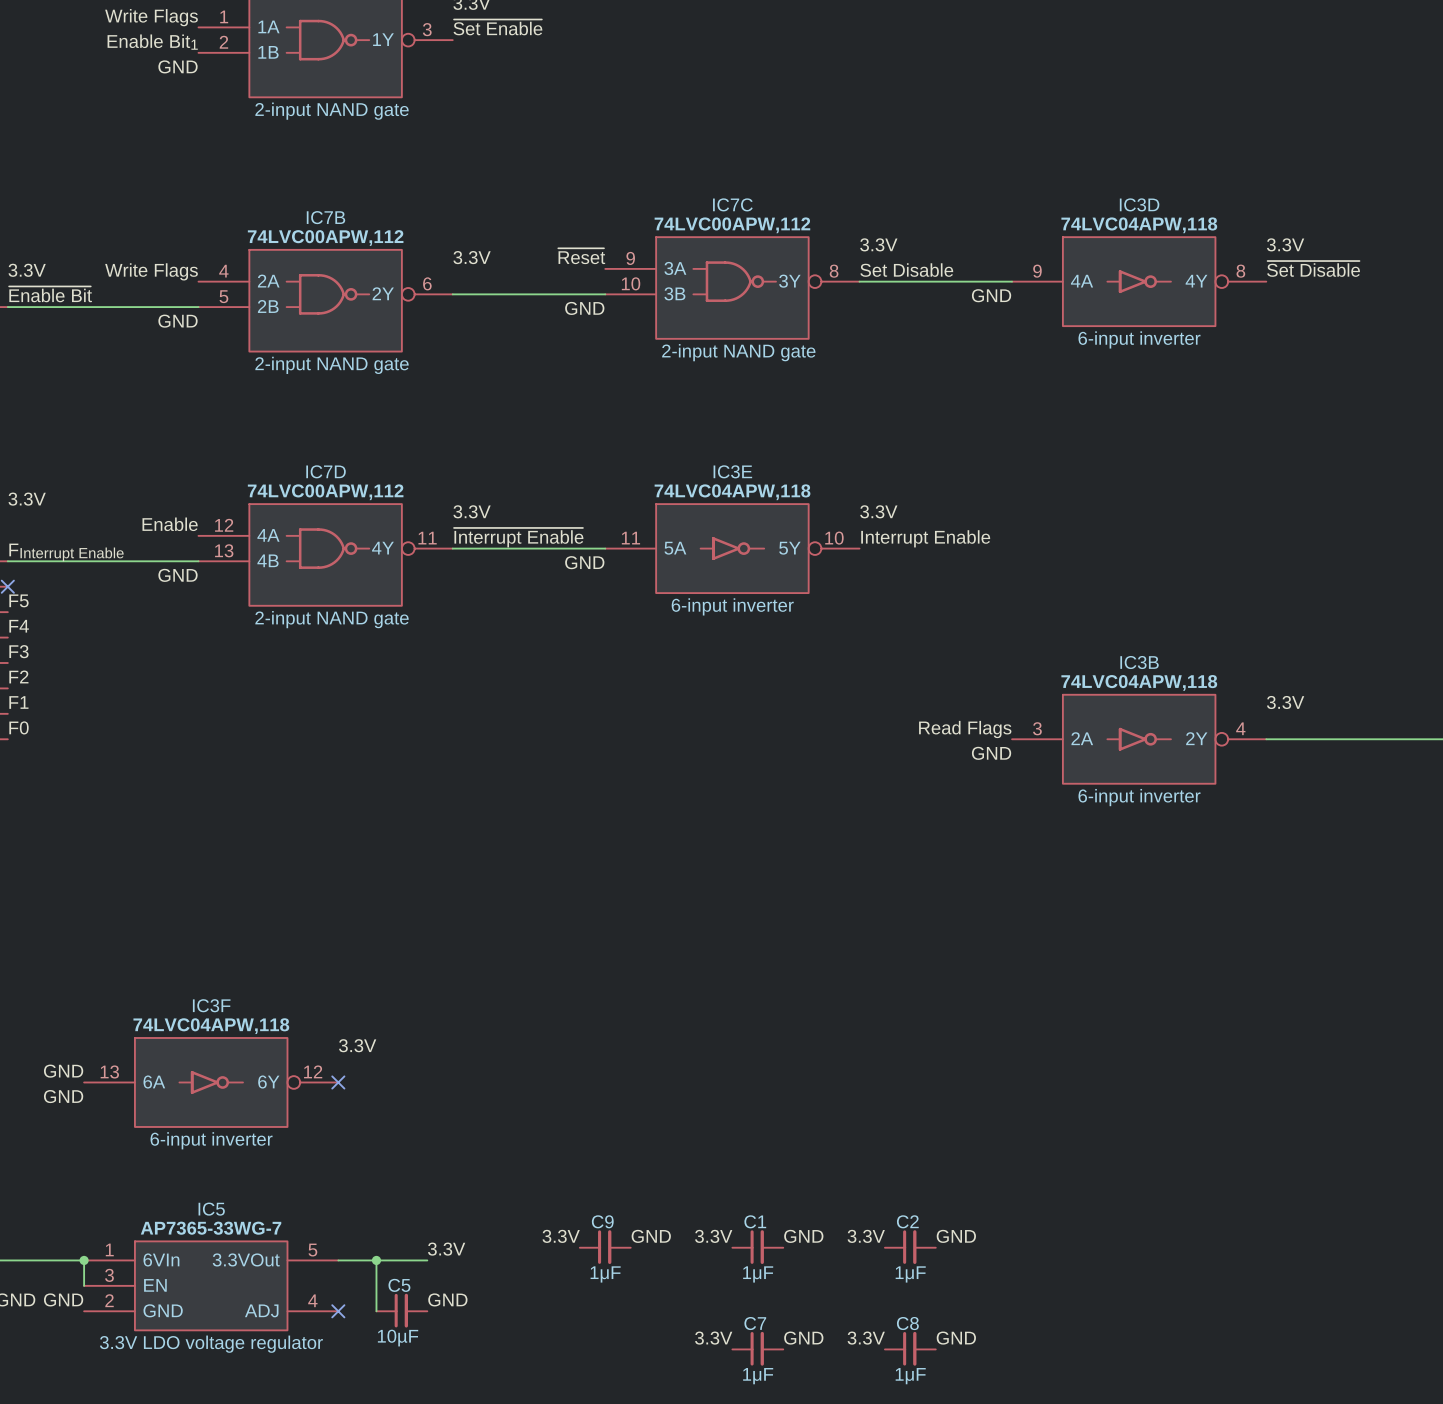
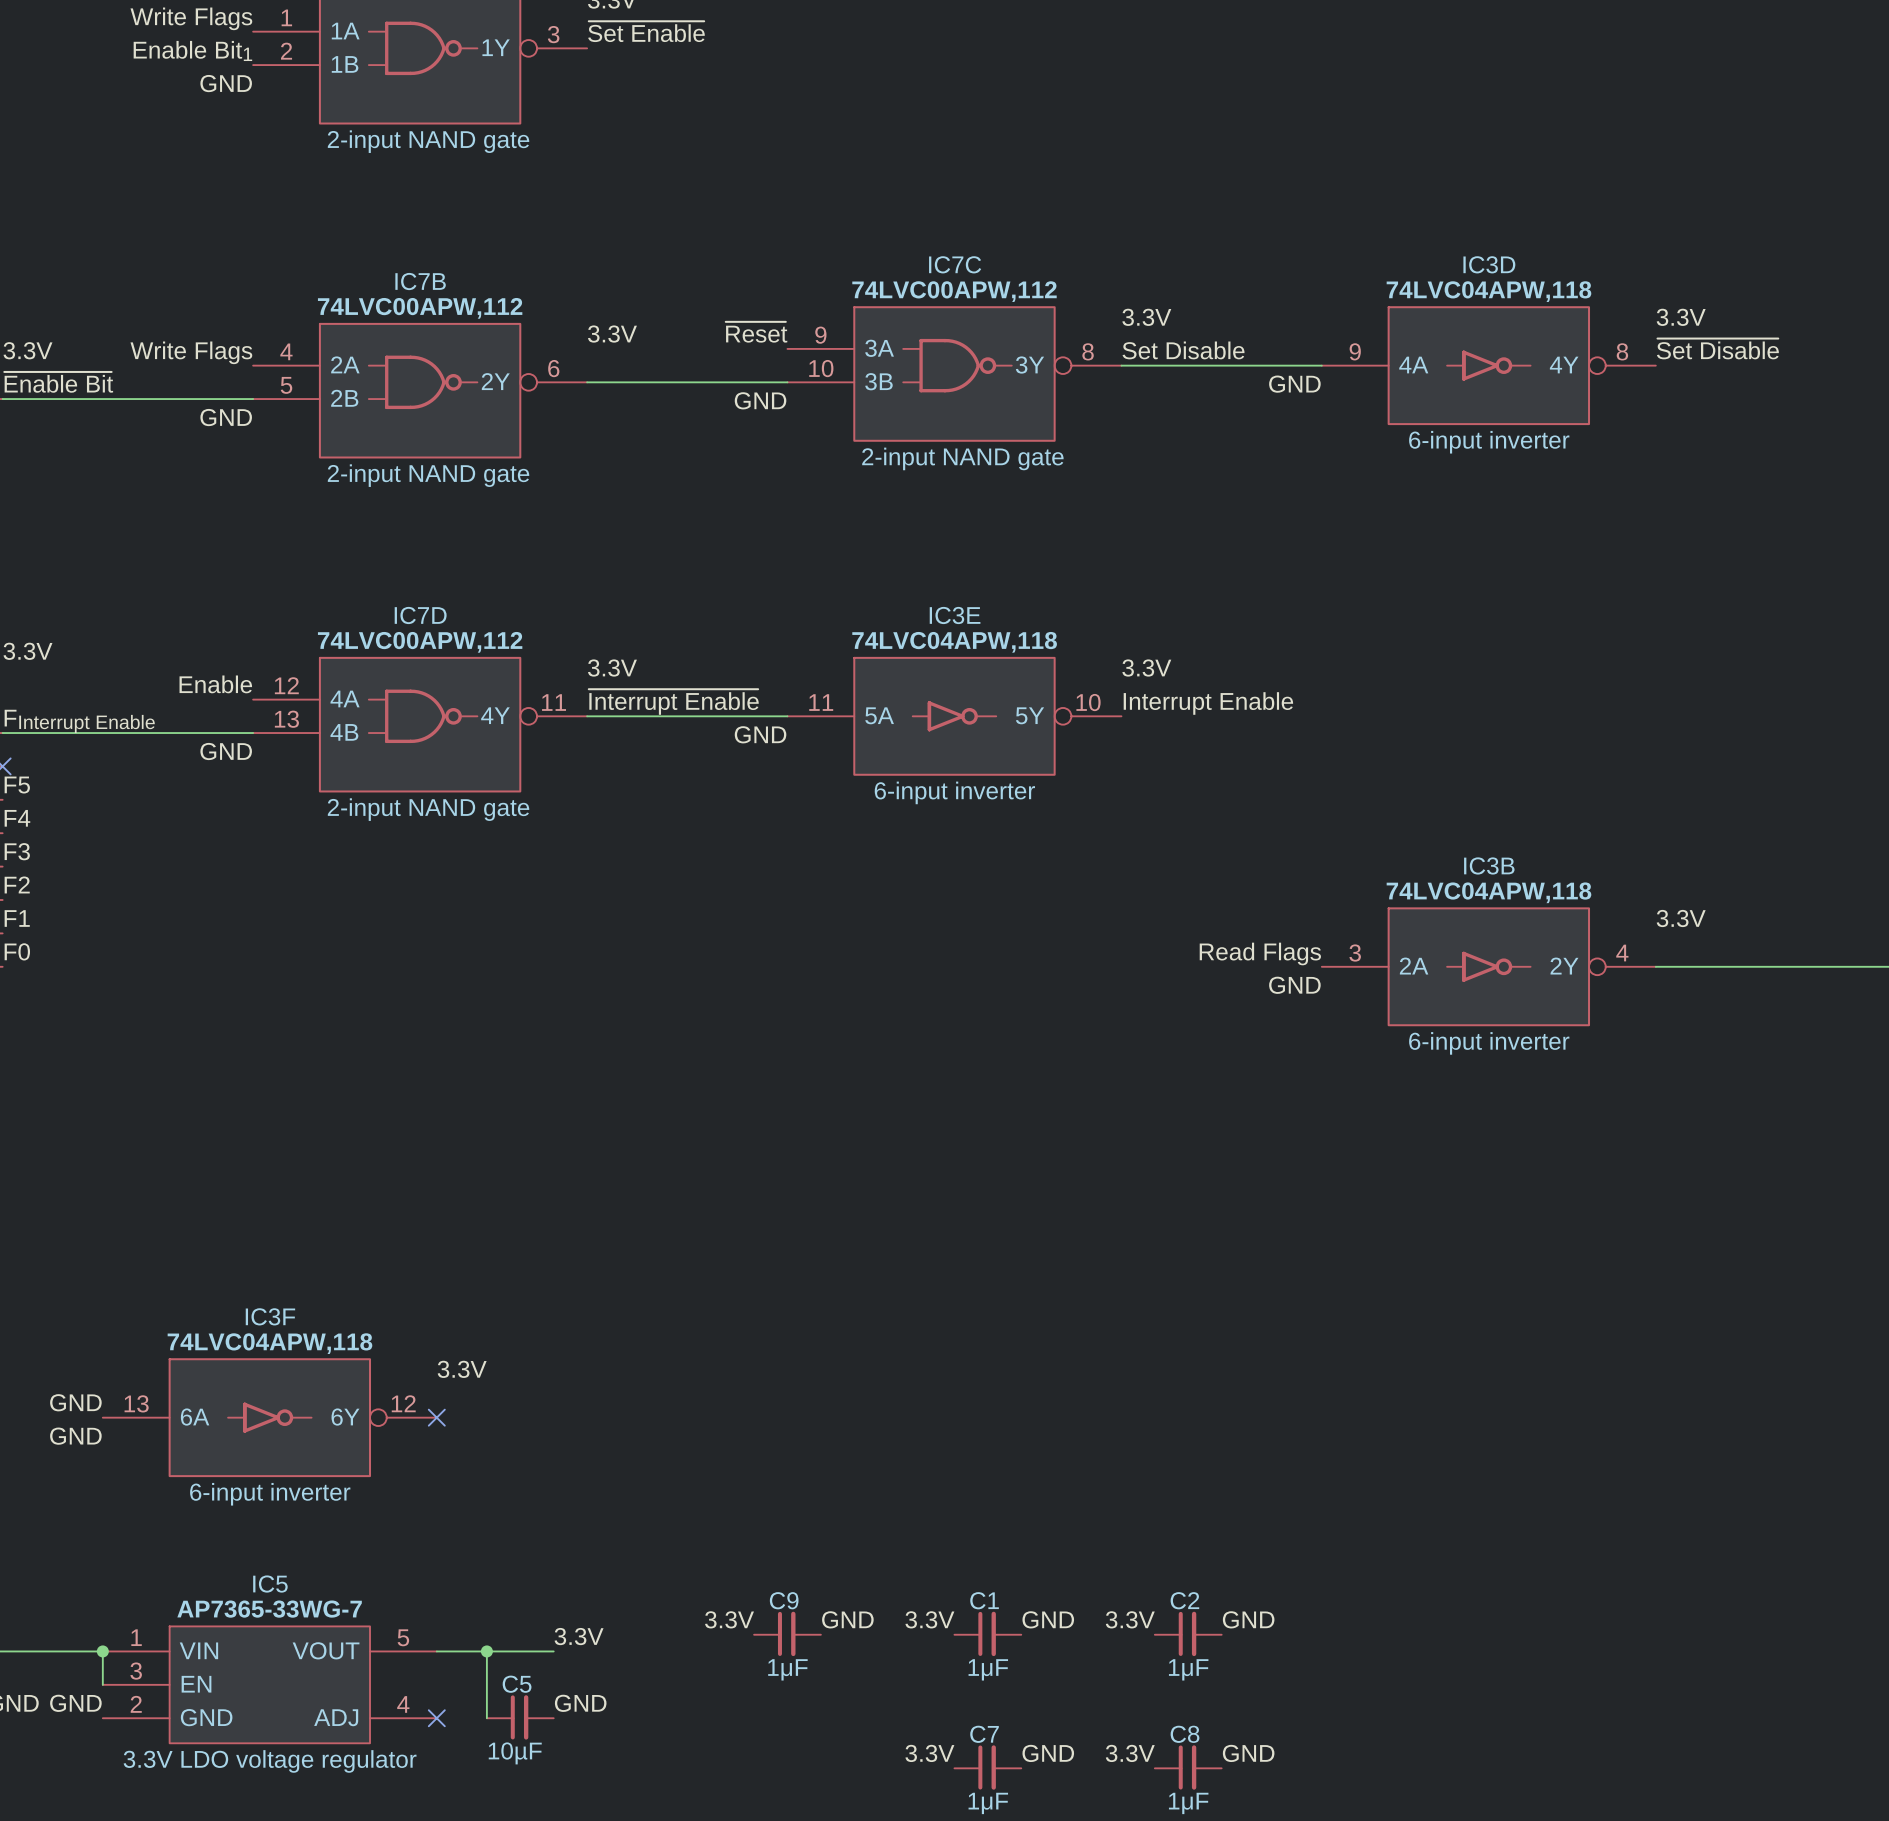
IC5 pin name: 6VIn (161, 1259) -> VIN (198, 1650)
IC5 pin name: 3.3VOut (246, 1259) -> VOUT (326, 1650)

